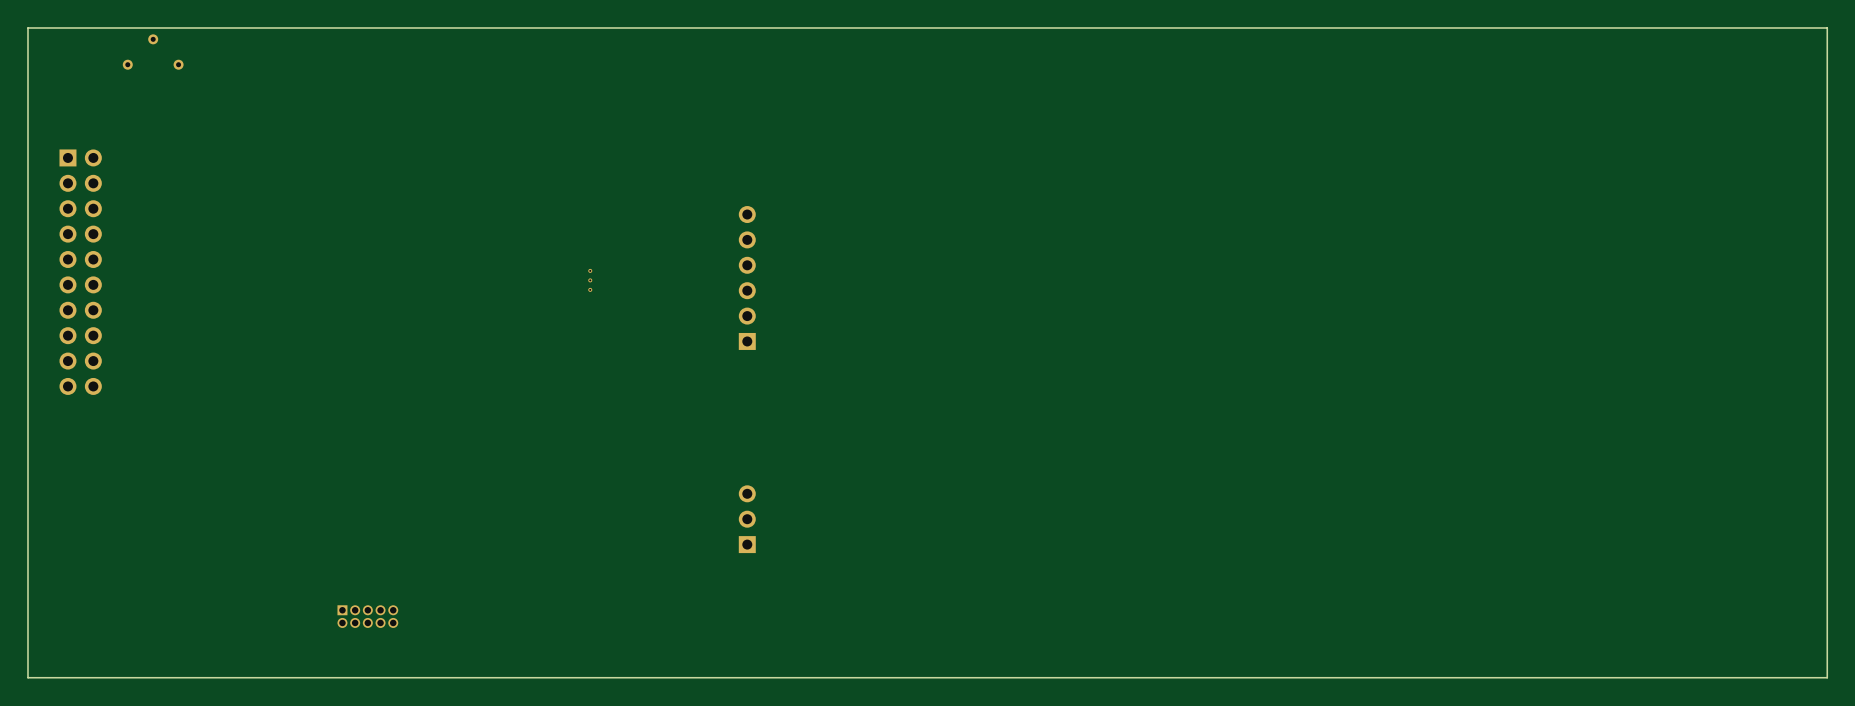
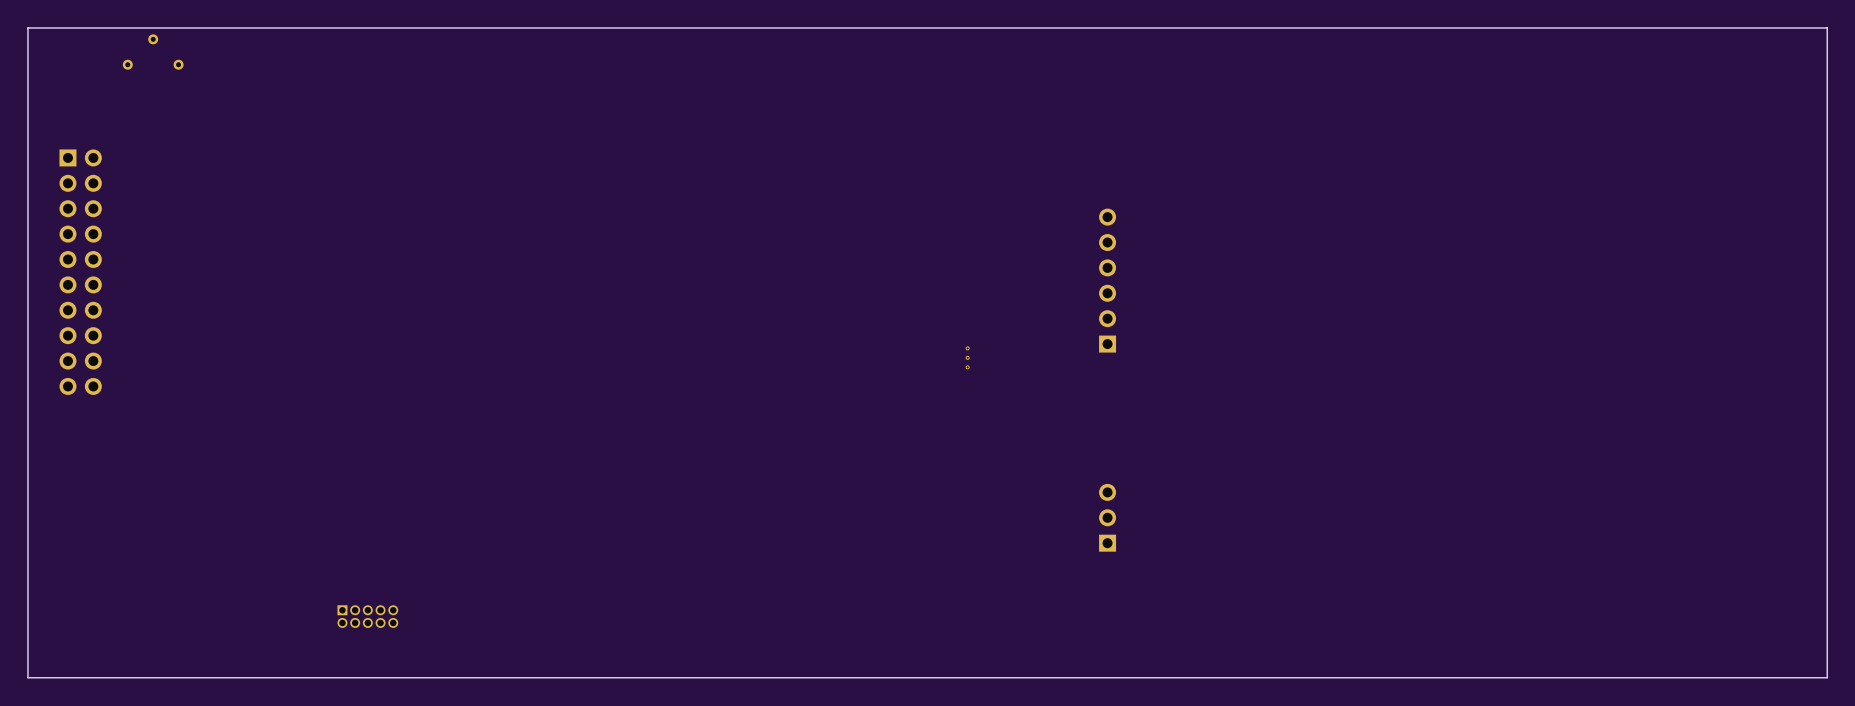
part: (747, 277) -> none
part: (590, 280) -> none
part: none -> (1107, 280)
part: none -> (967, 357)
part: none -> (1107, 517)
part: (747, 519) -> none

